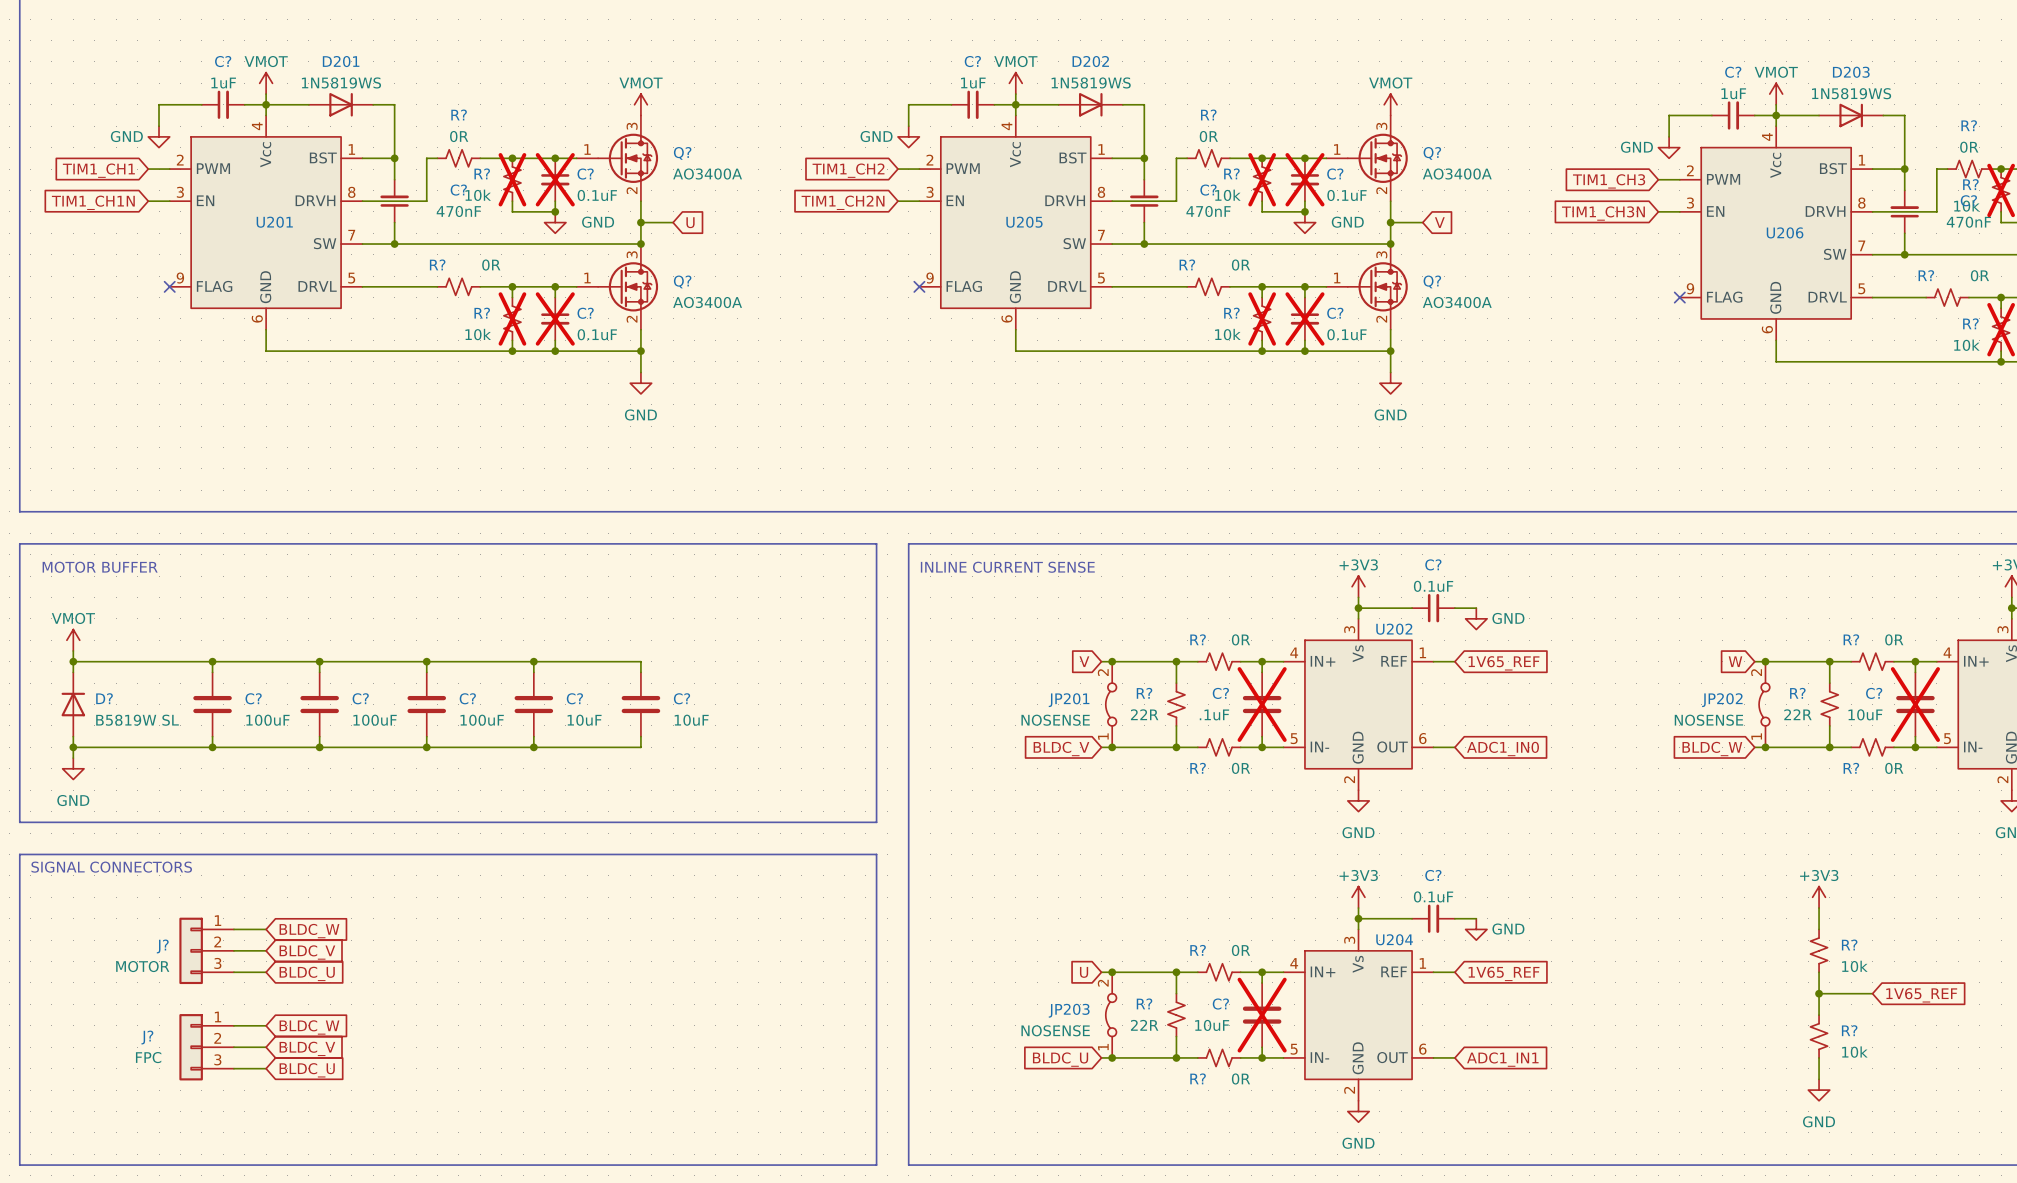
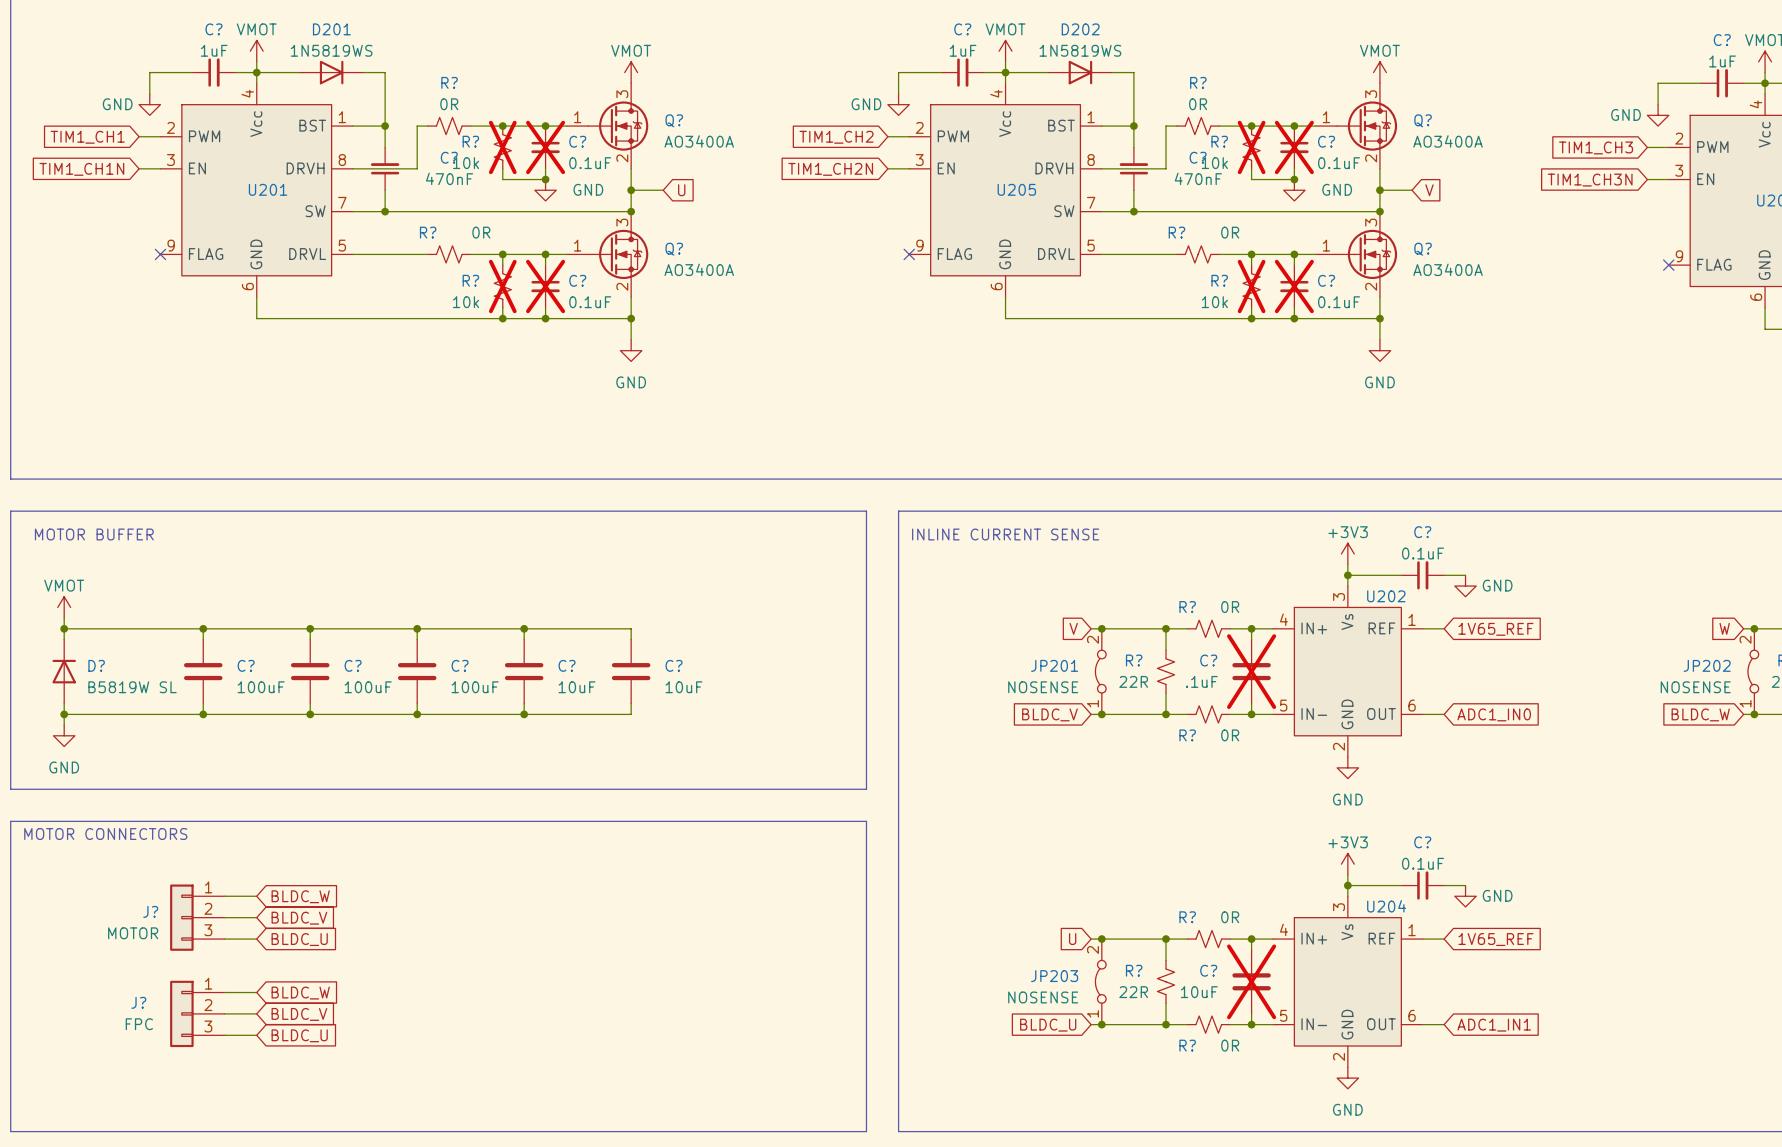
text: SIGNAL CONNECTORS (111, 867) -> MOTOR CONNECTORS (105, 834)

